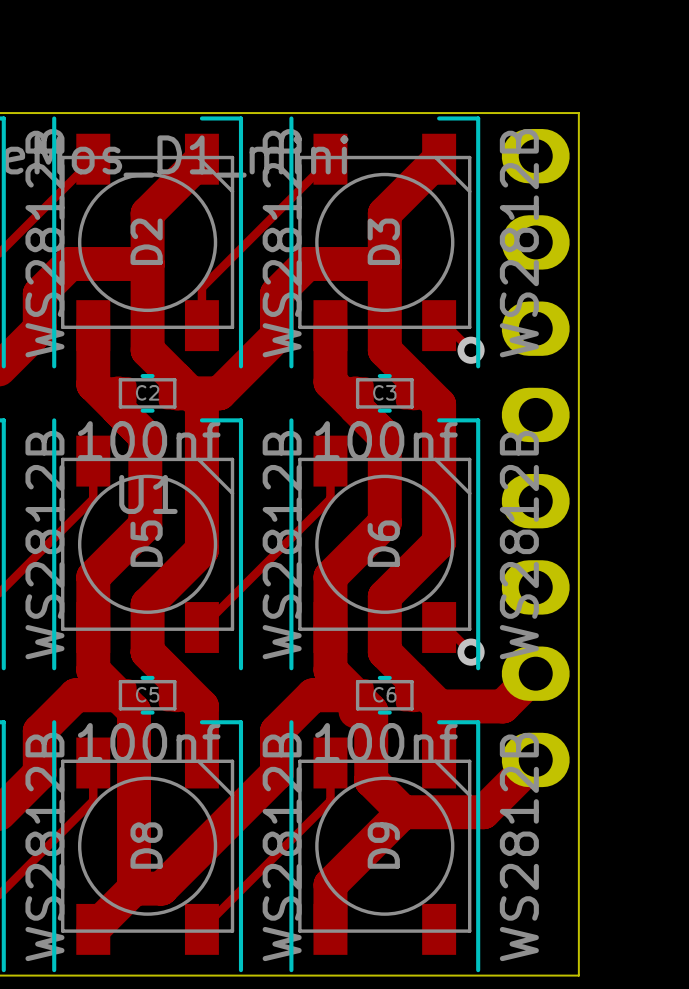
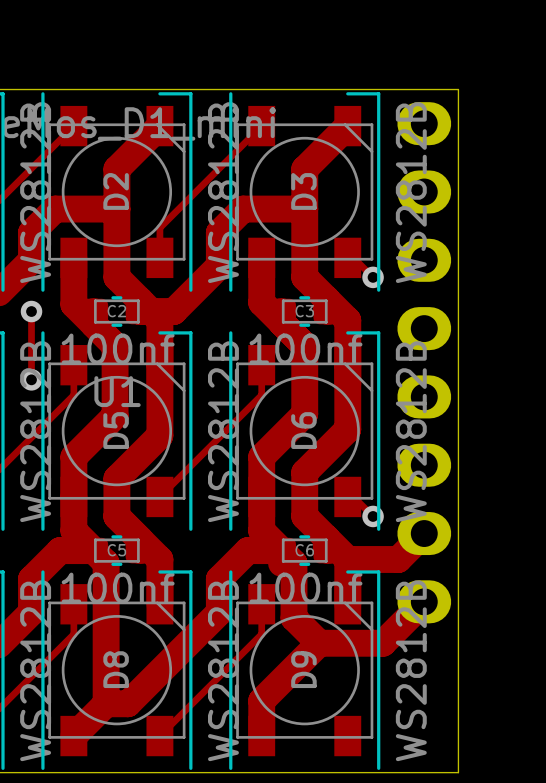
track: none -> (31, 311) (31, 379)
via: none -> (31, 311)
via: none -> (31, 379)

